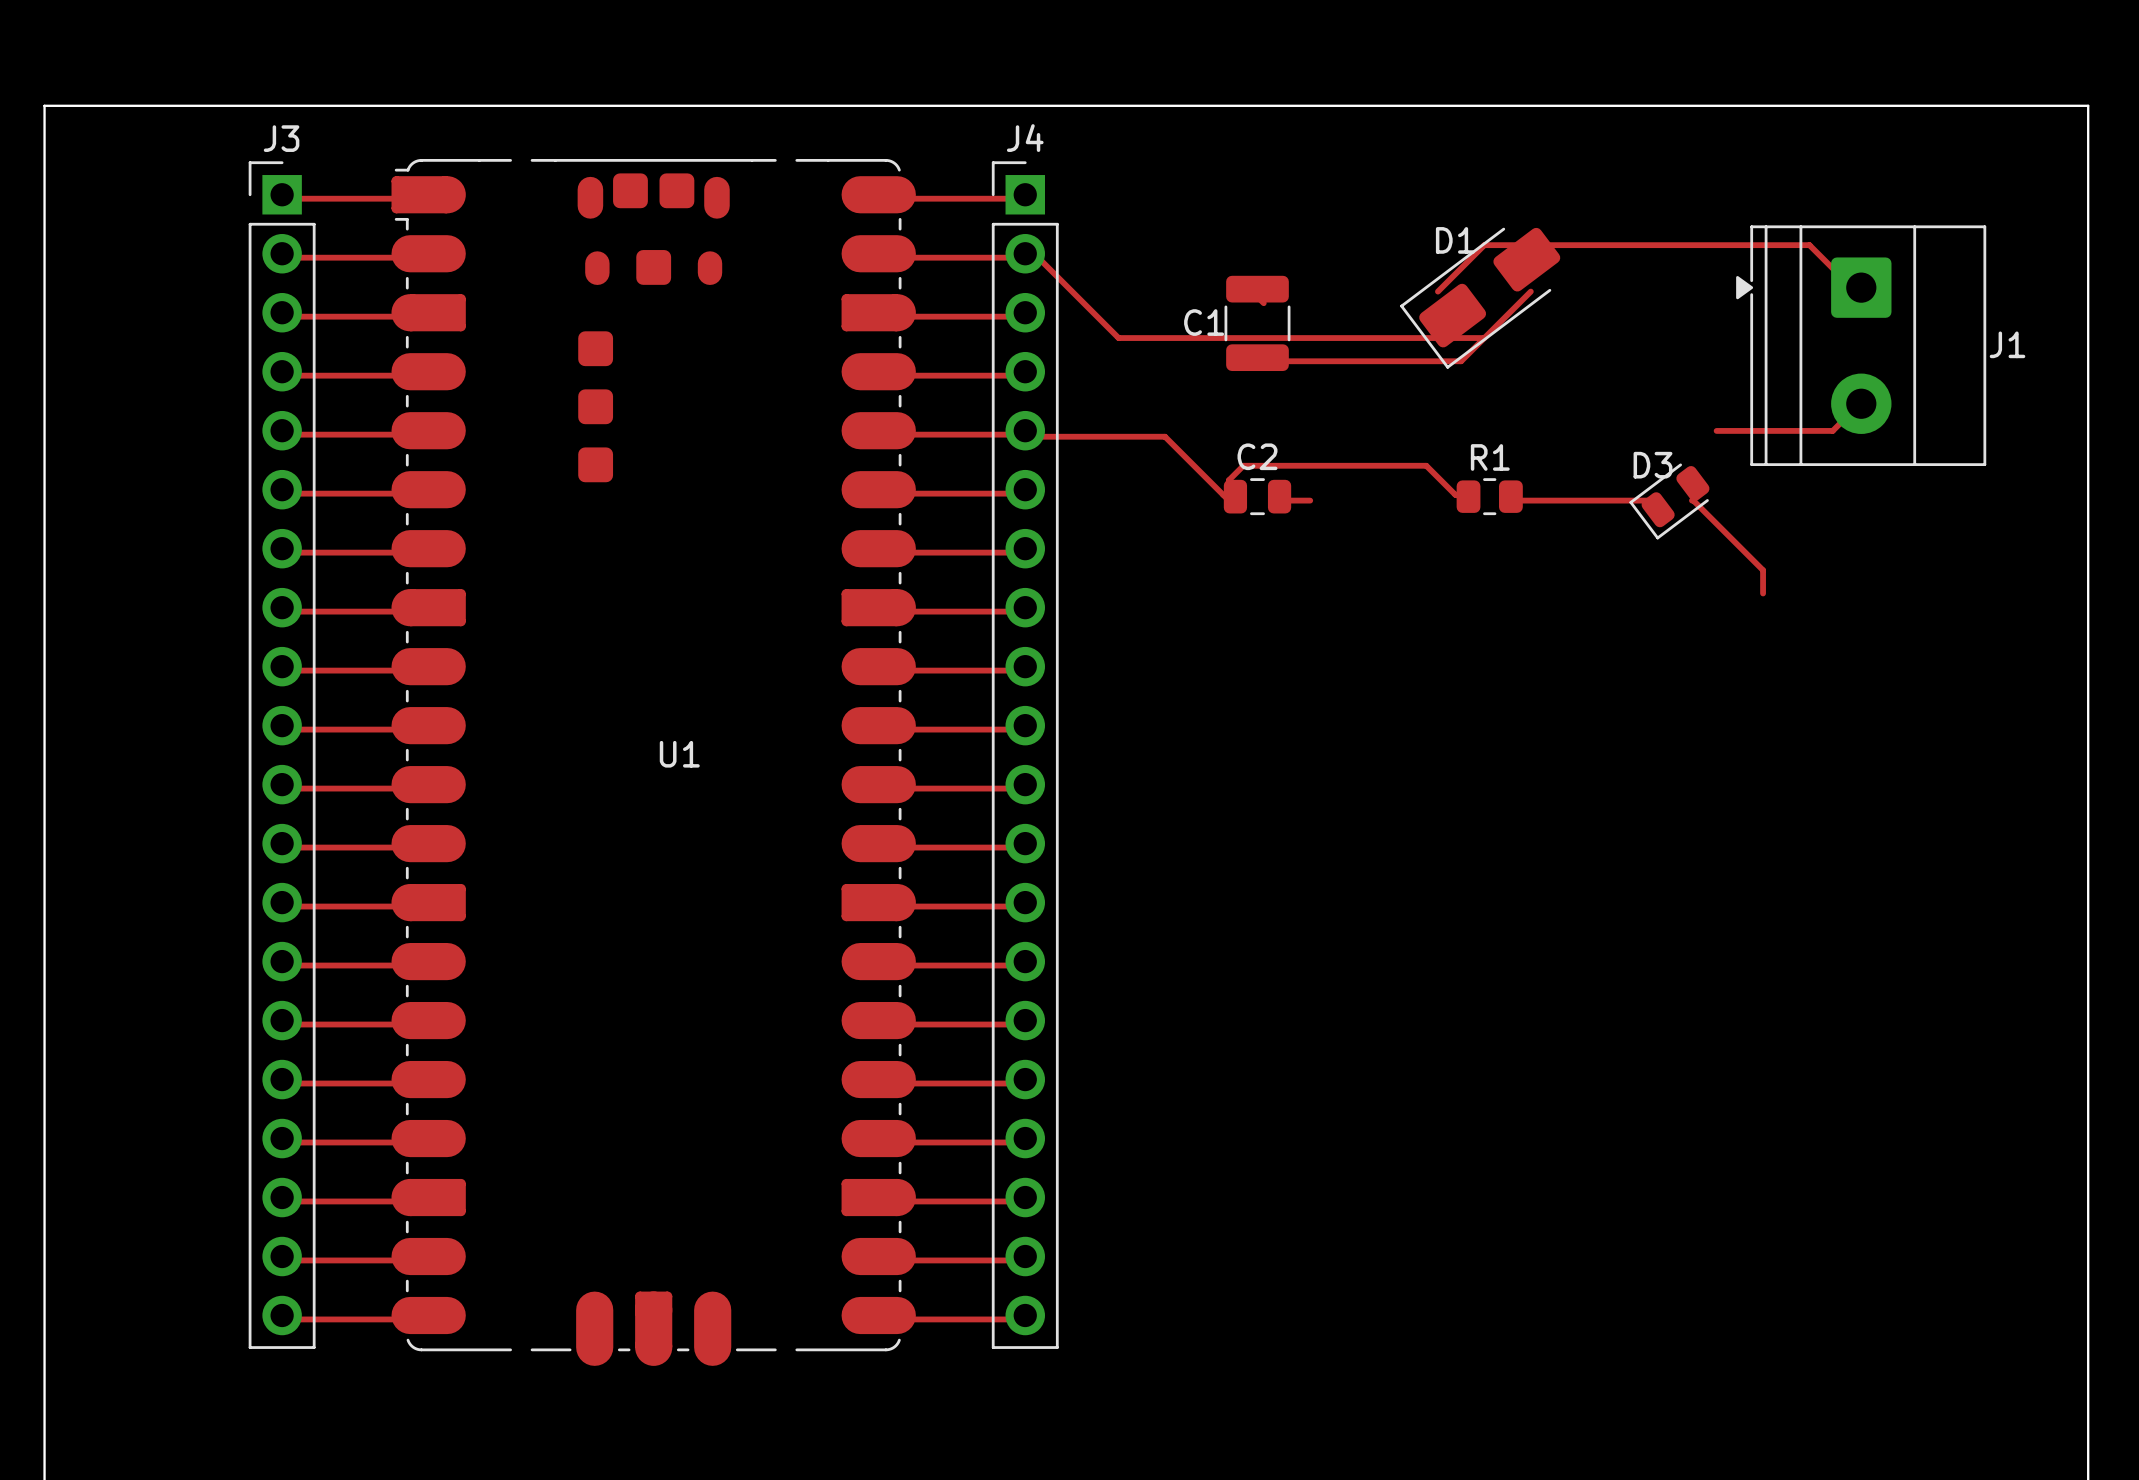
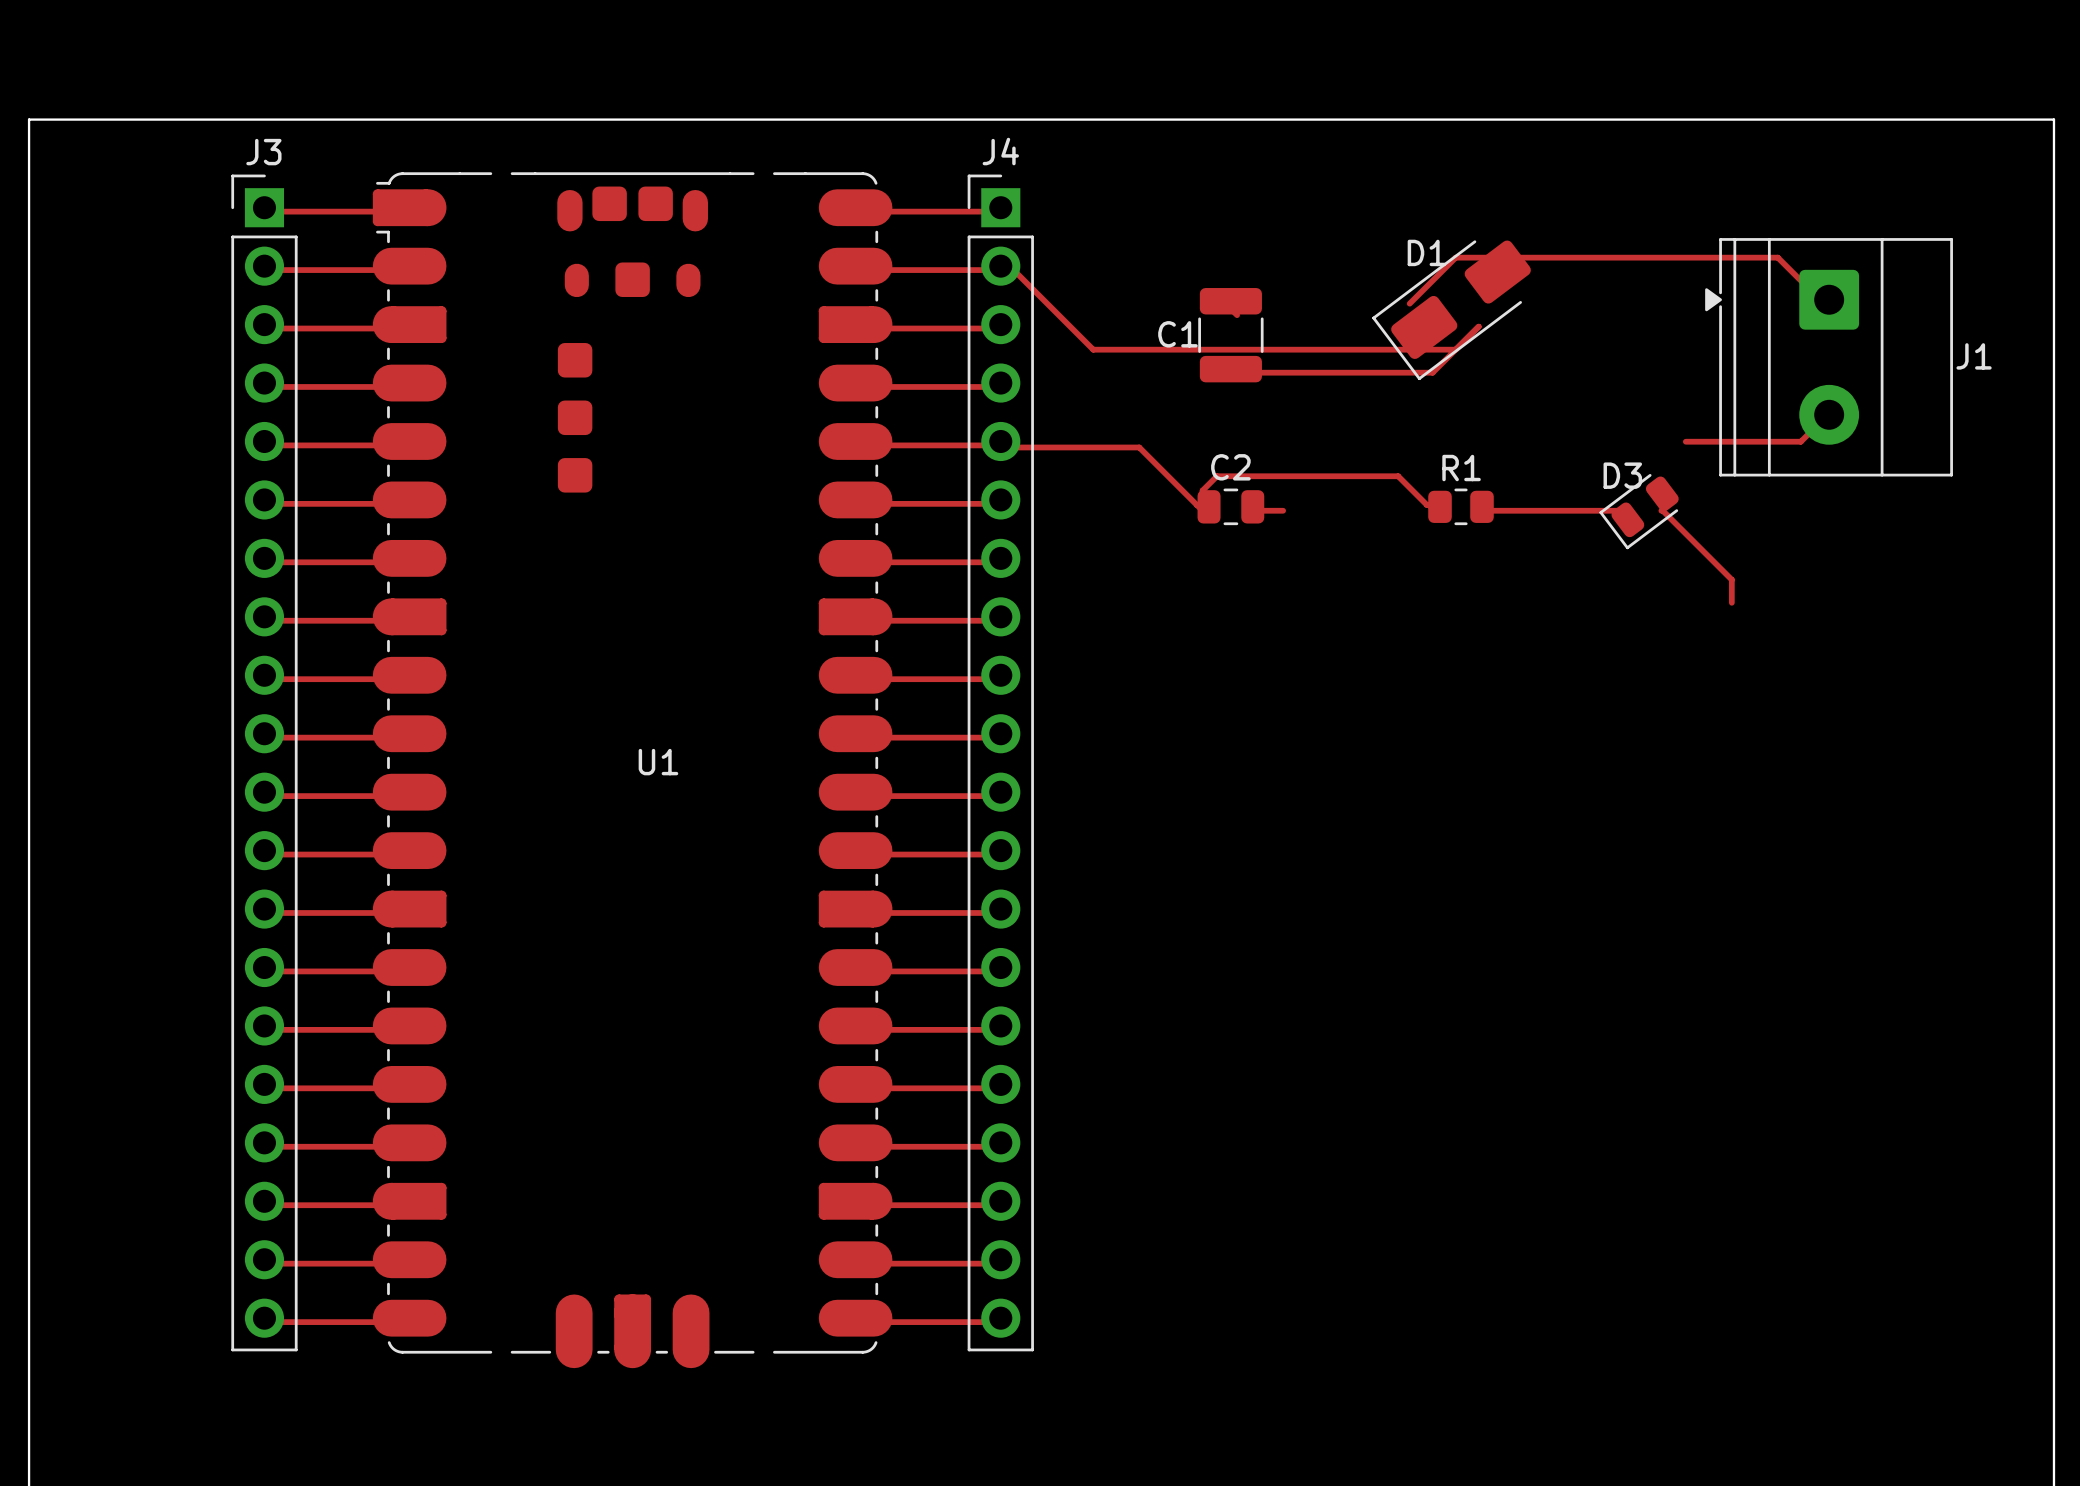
track: (1530, 291) (1507, 314) -> none

